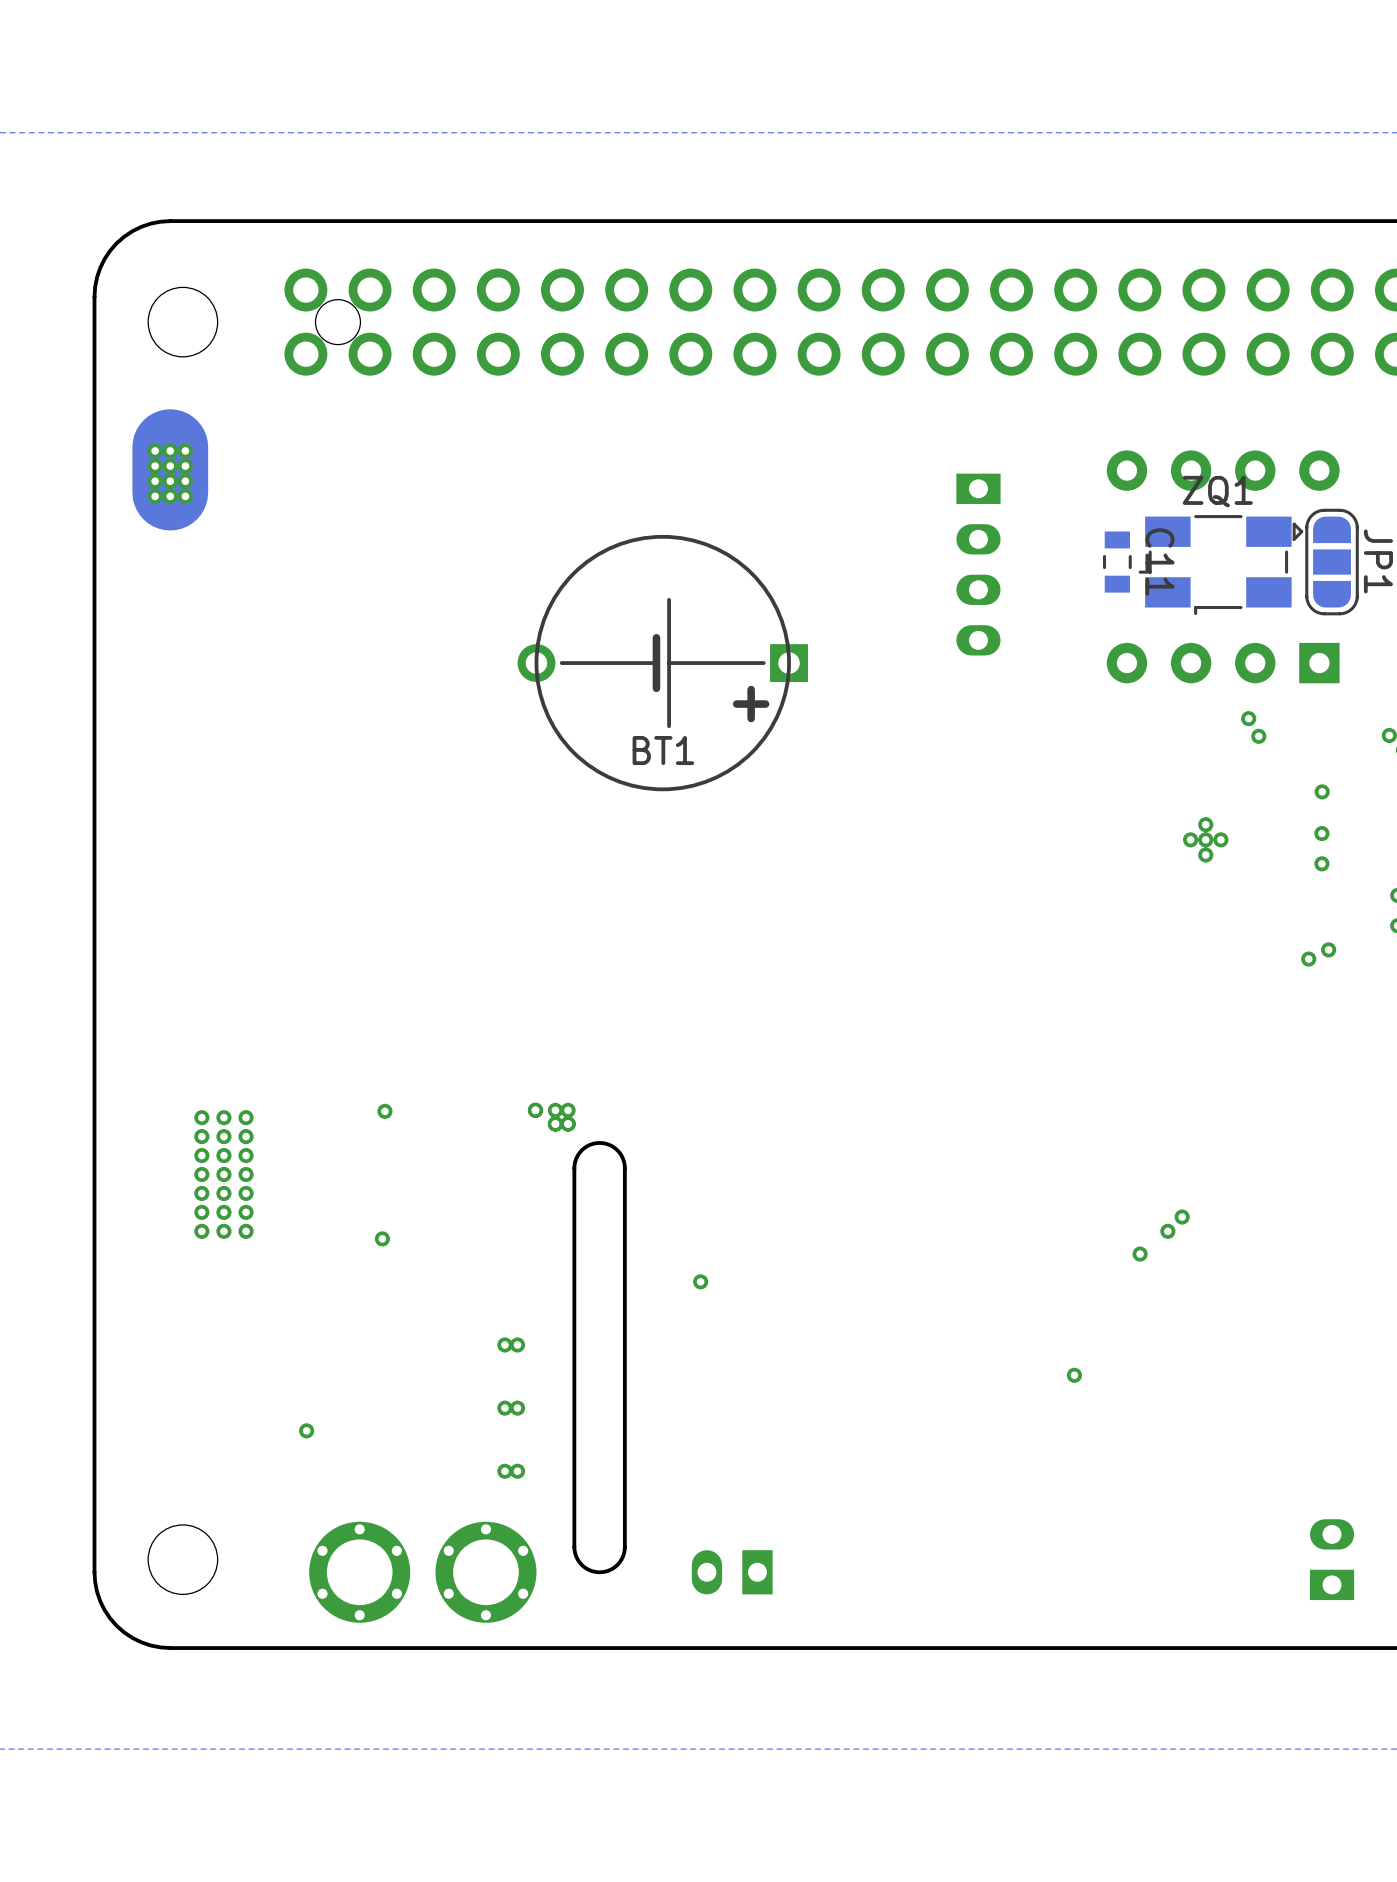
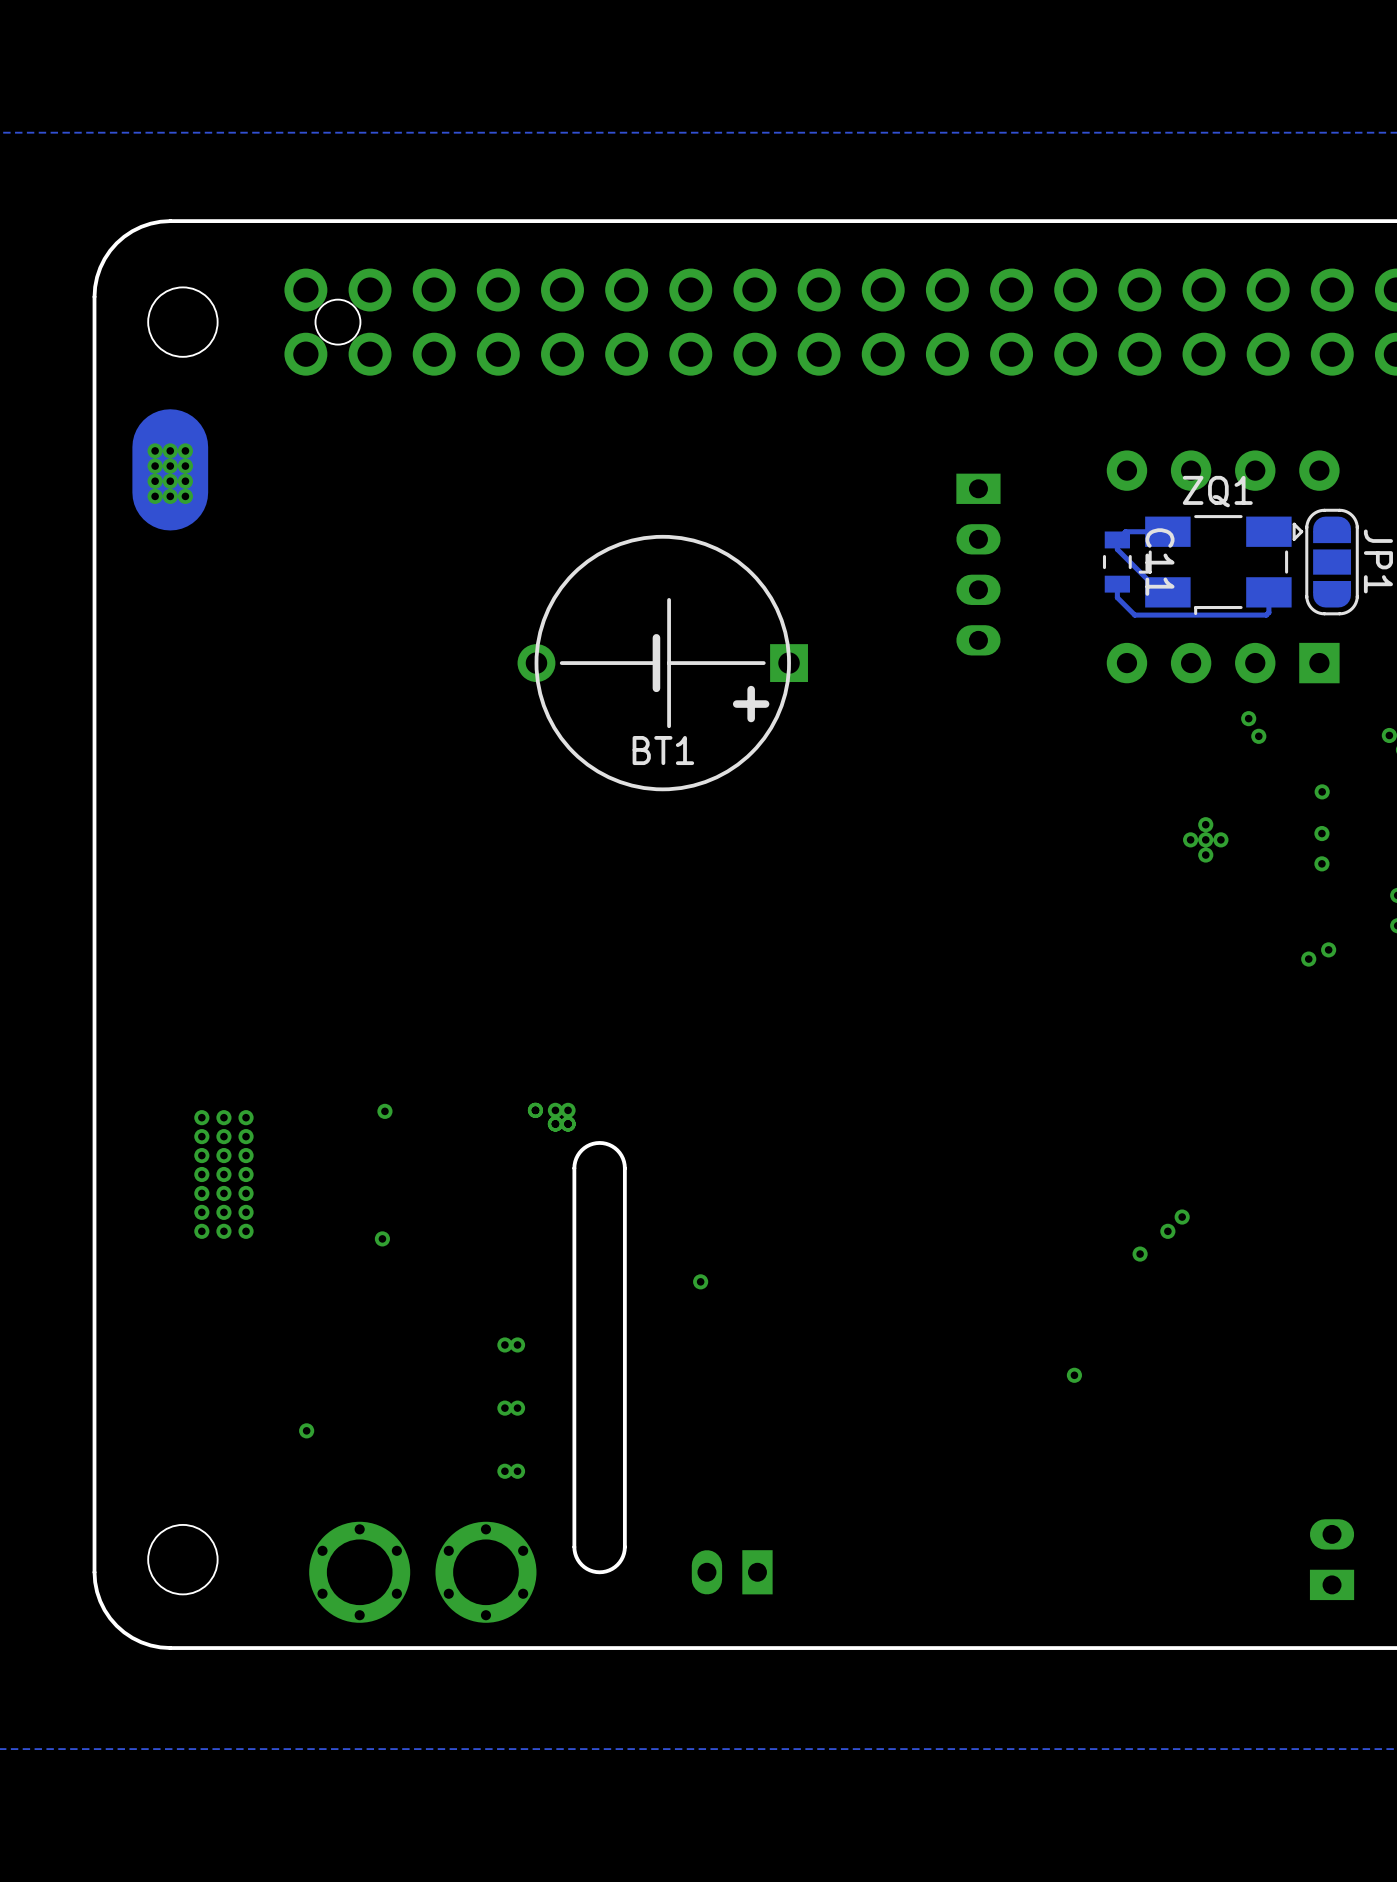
track: none -> (1167, 531) (1125, 531) (1117, 539) (1117, 549) (1160, 592) (1167, 592)
track: none -> (1117, 584) (1117, 597) (1134, 615) (1266, 615) (1268, 612) (1268, 592)

